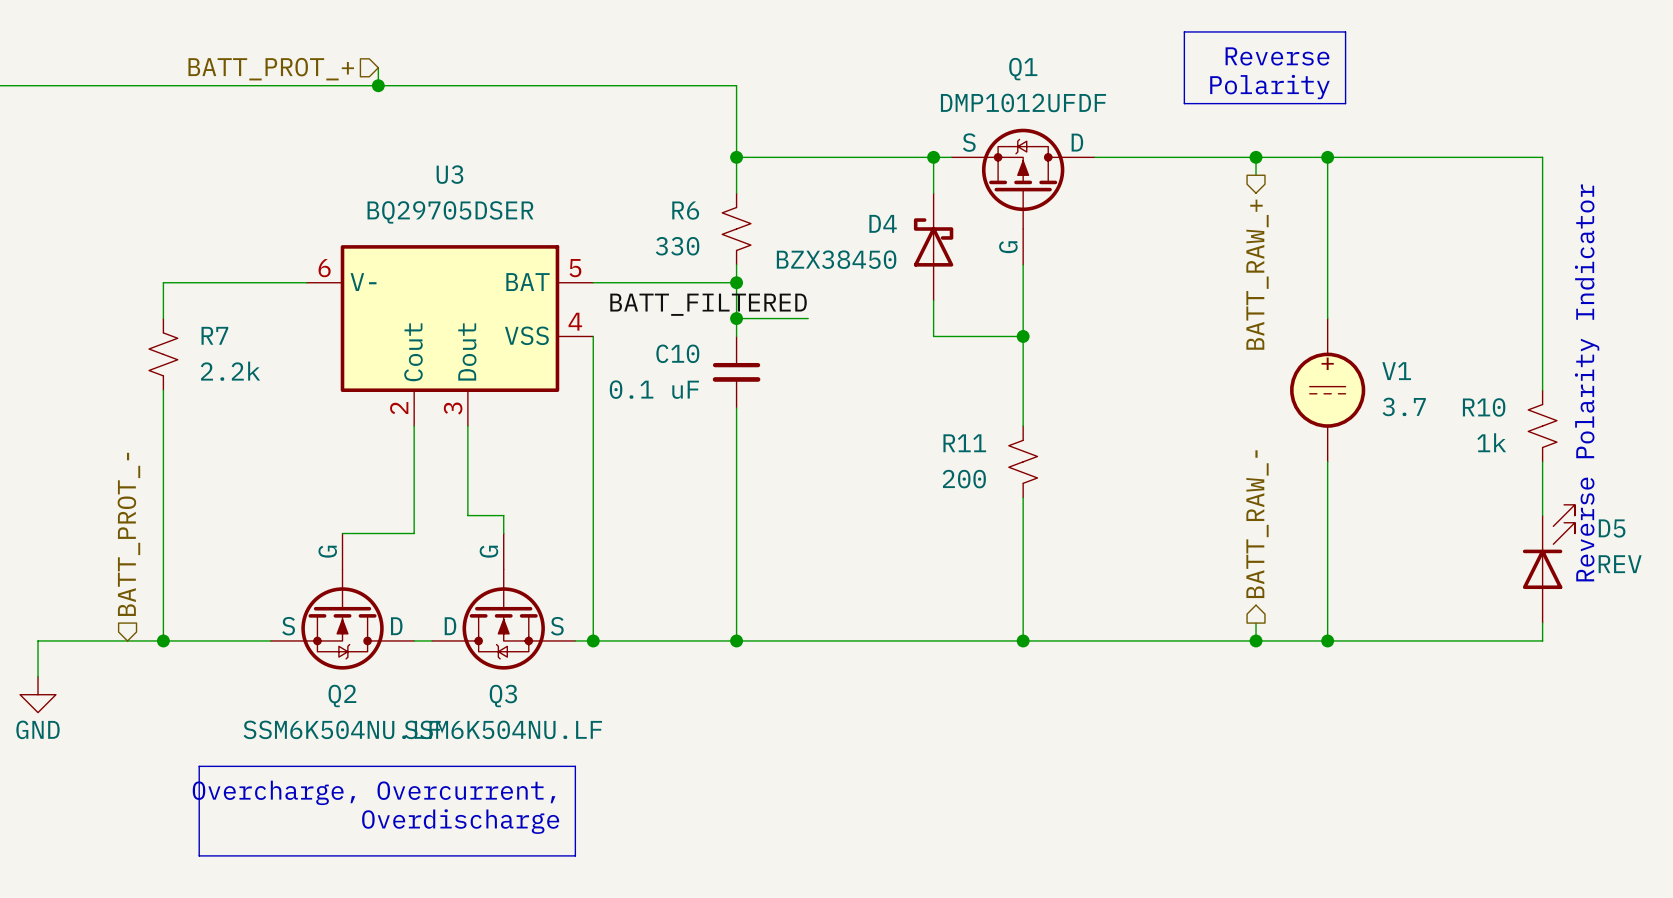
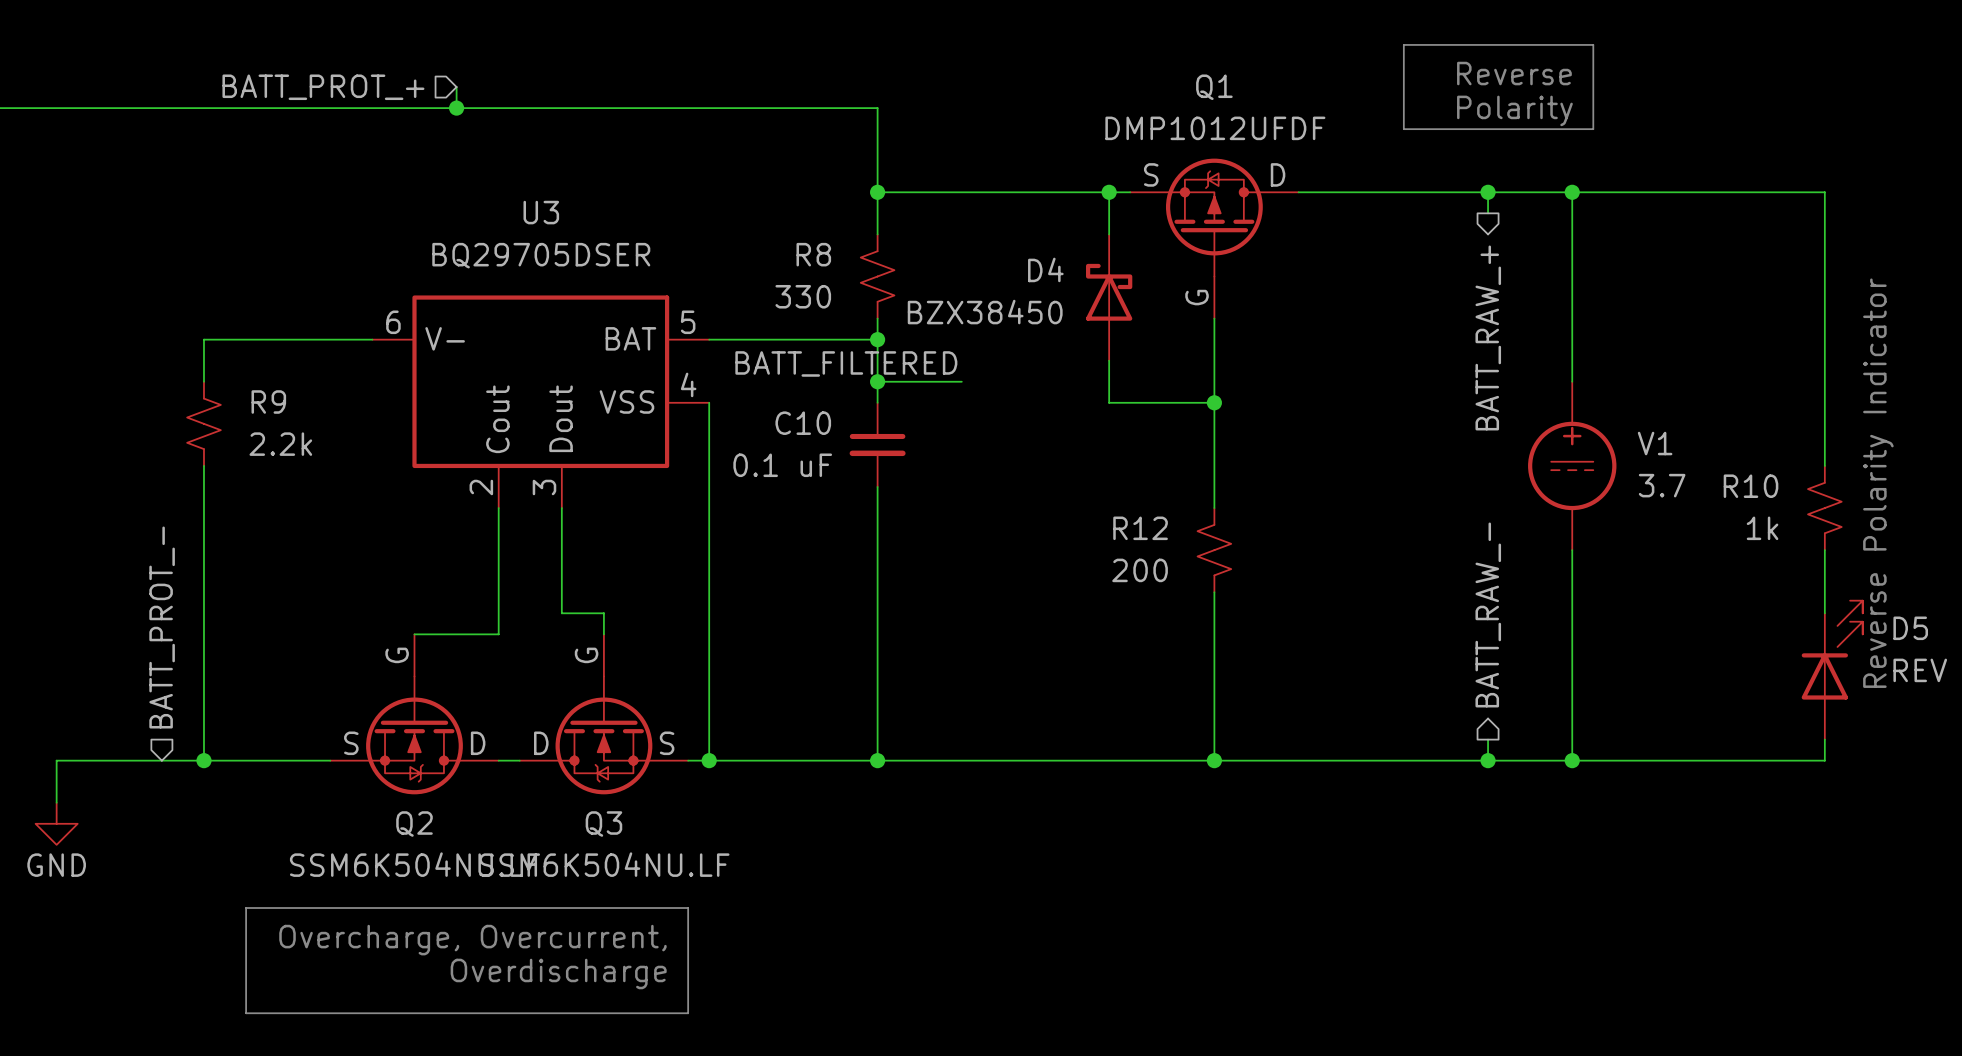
R6 name: R6 (685, 210) -> R8 (813, 254)
R7 name: R7 (214, 335) -> R9 (268, 402)
R11 name: R11 (964, 443) -> R12 (1140, 528)

